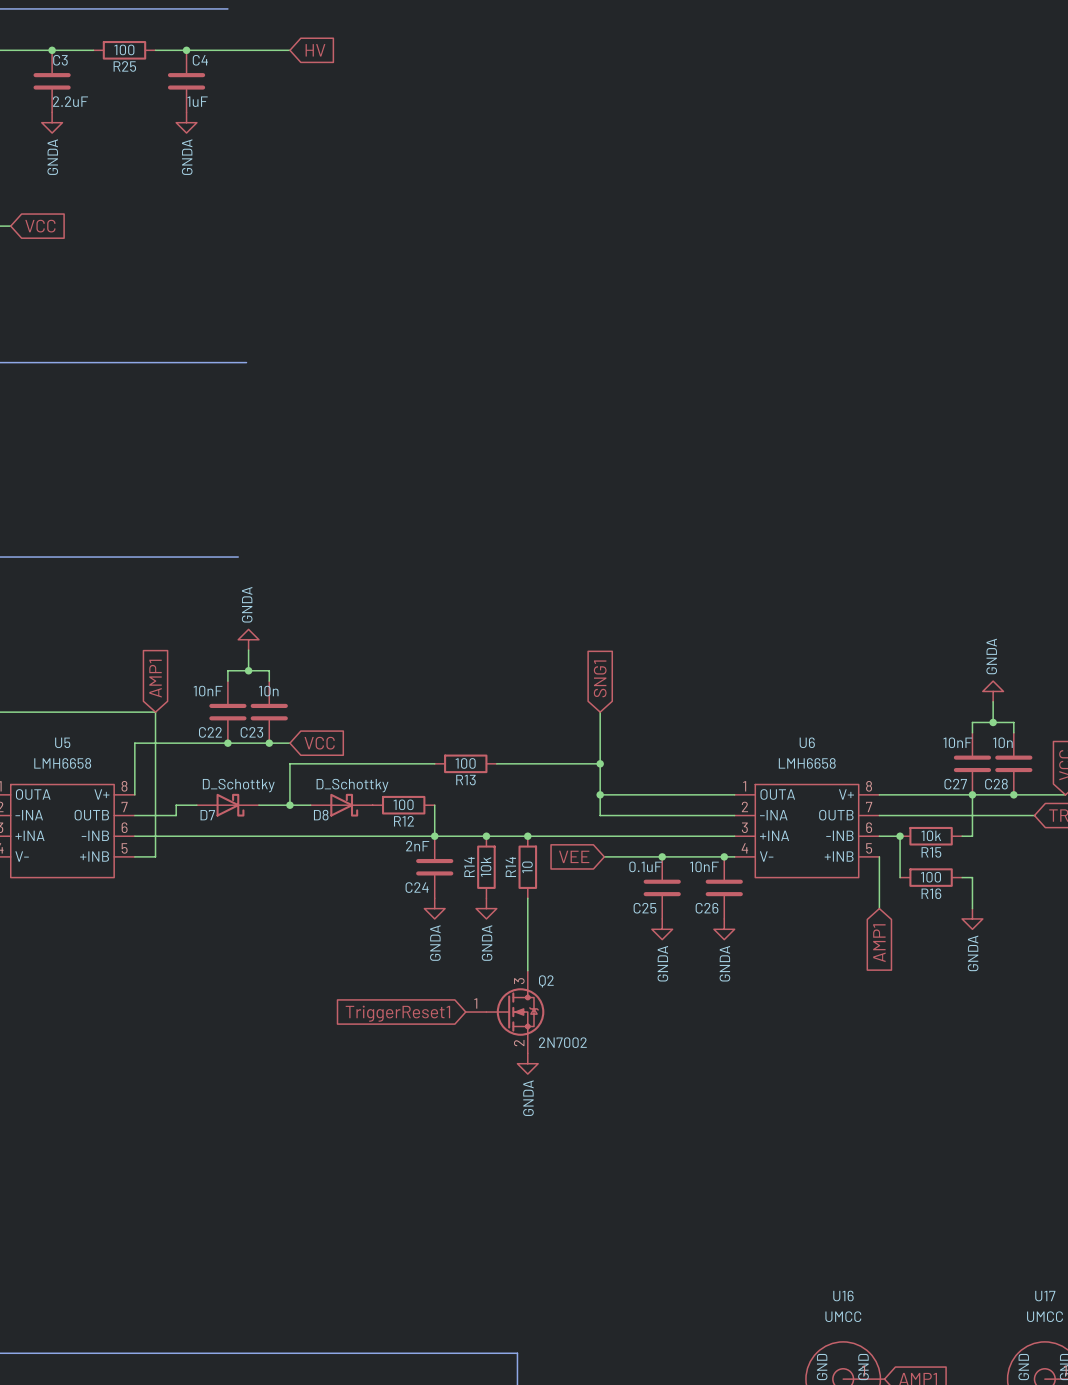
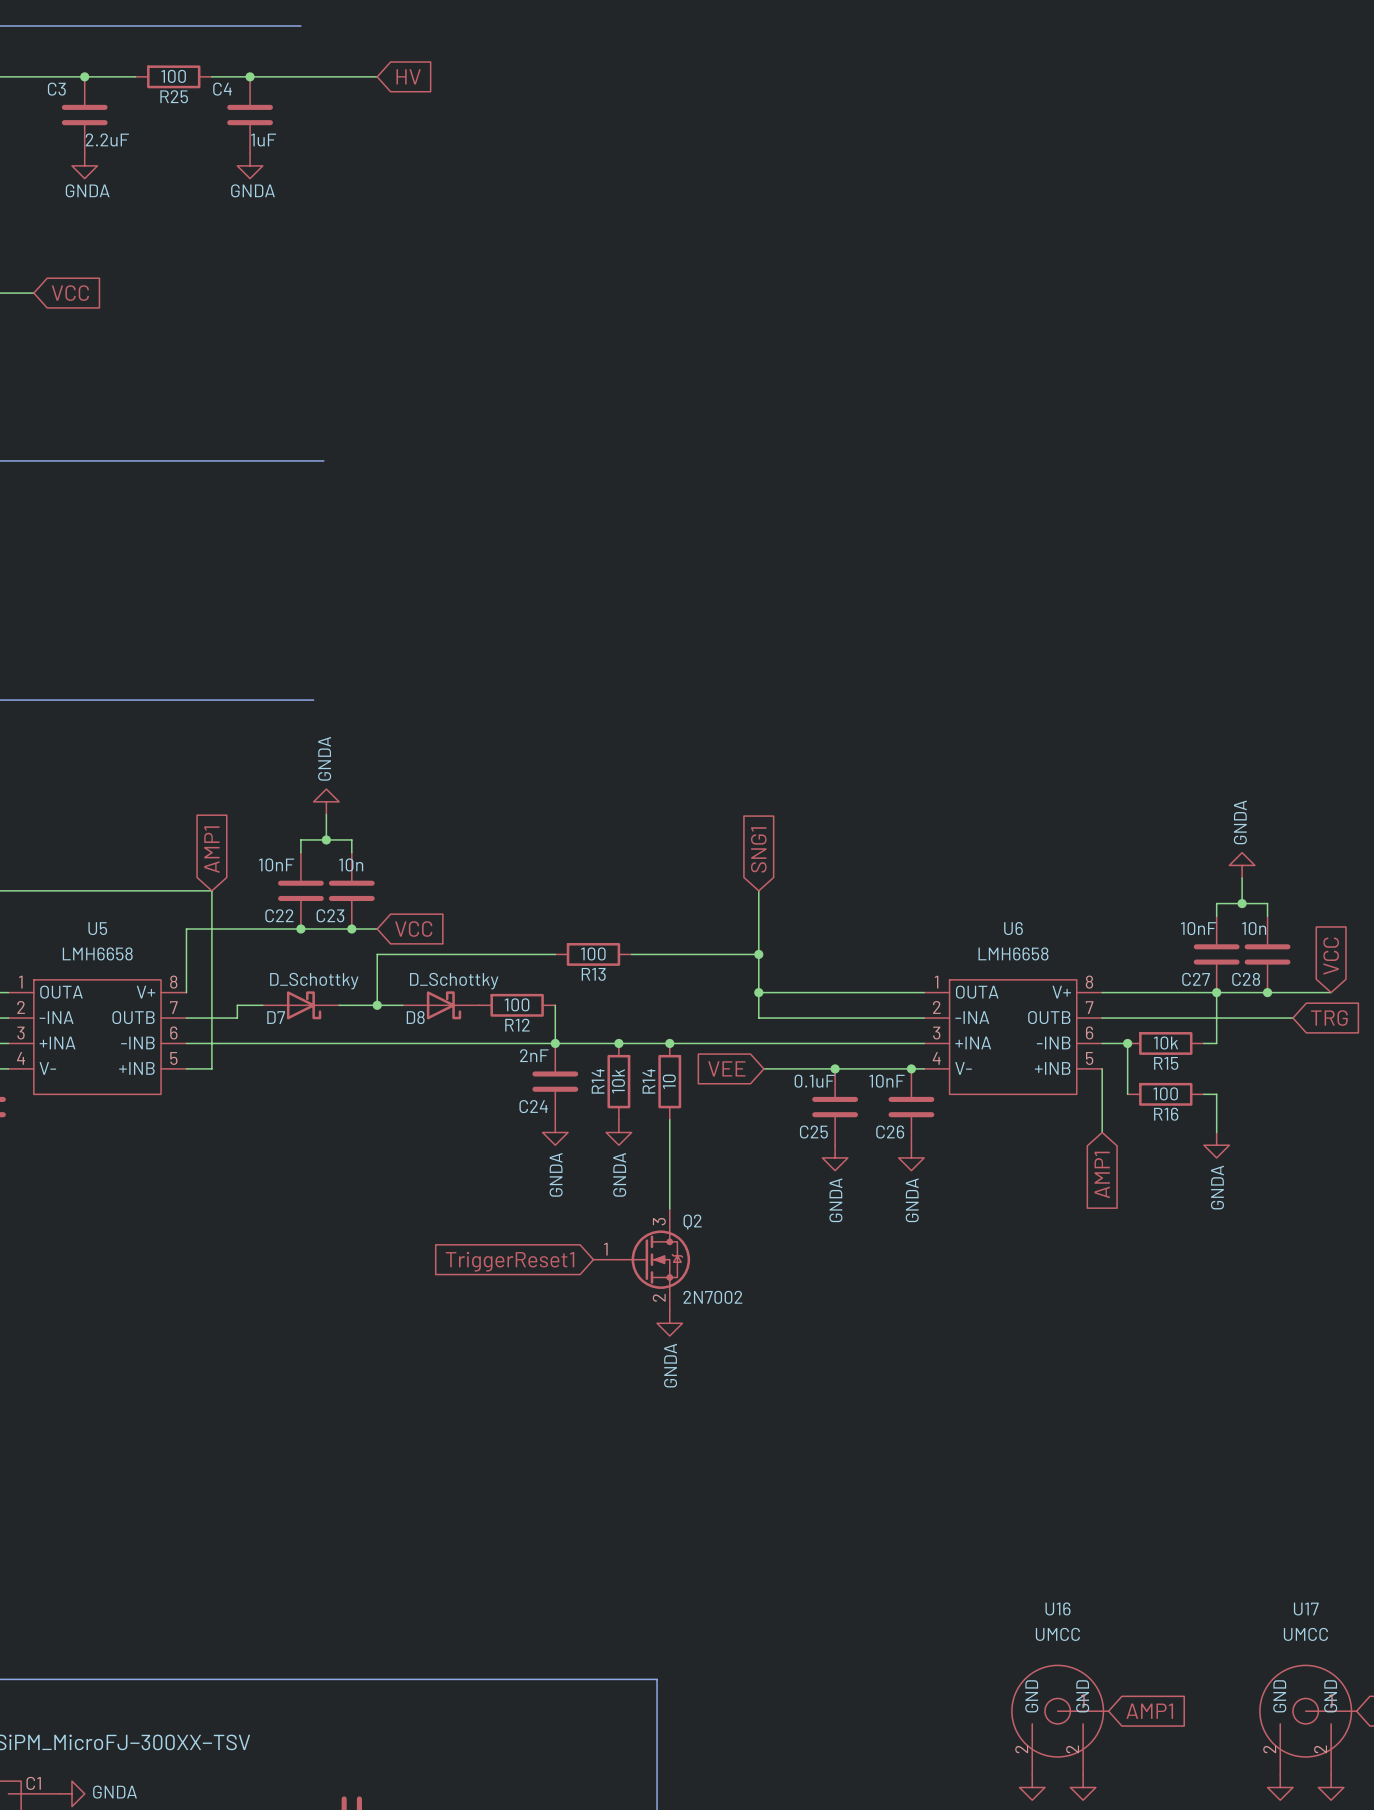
C3 name position: C3 (60, 60) -> C3 (56, 89)
C4 name position: C4 (200, 60) -> C4 (222, 89)
power symbol text rotation: 0° (52, 157) -> 90° clockwise (87, 190)
power symbol text rotation: 0° (187, 157) -> 90° clockwise (252, 190)

